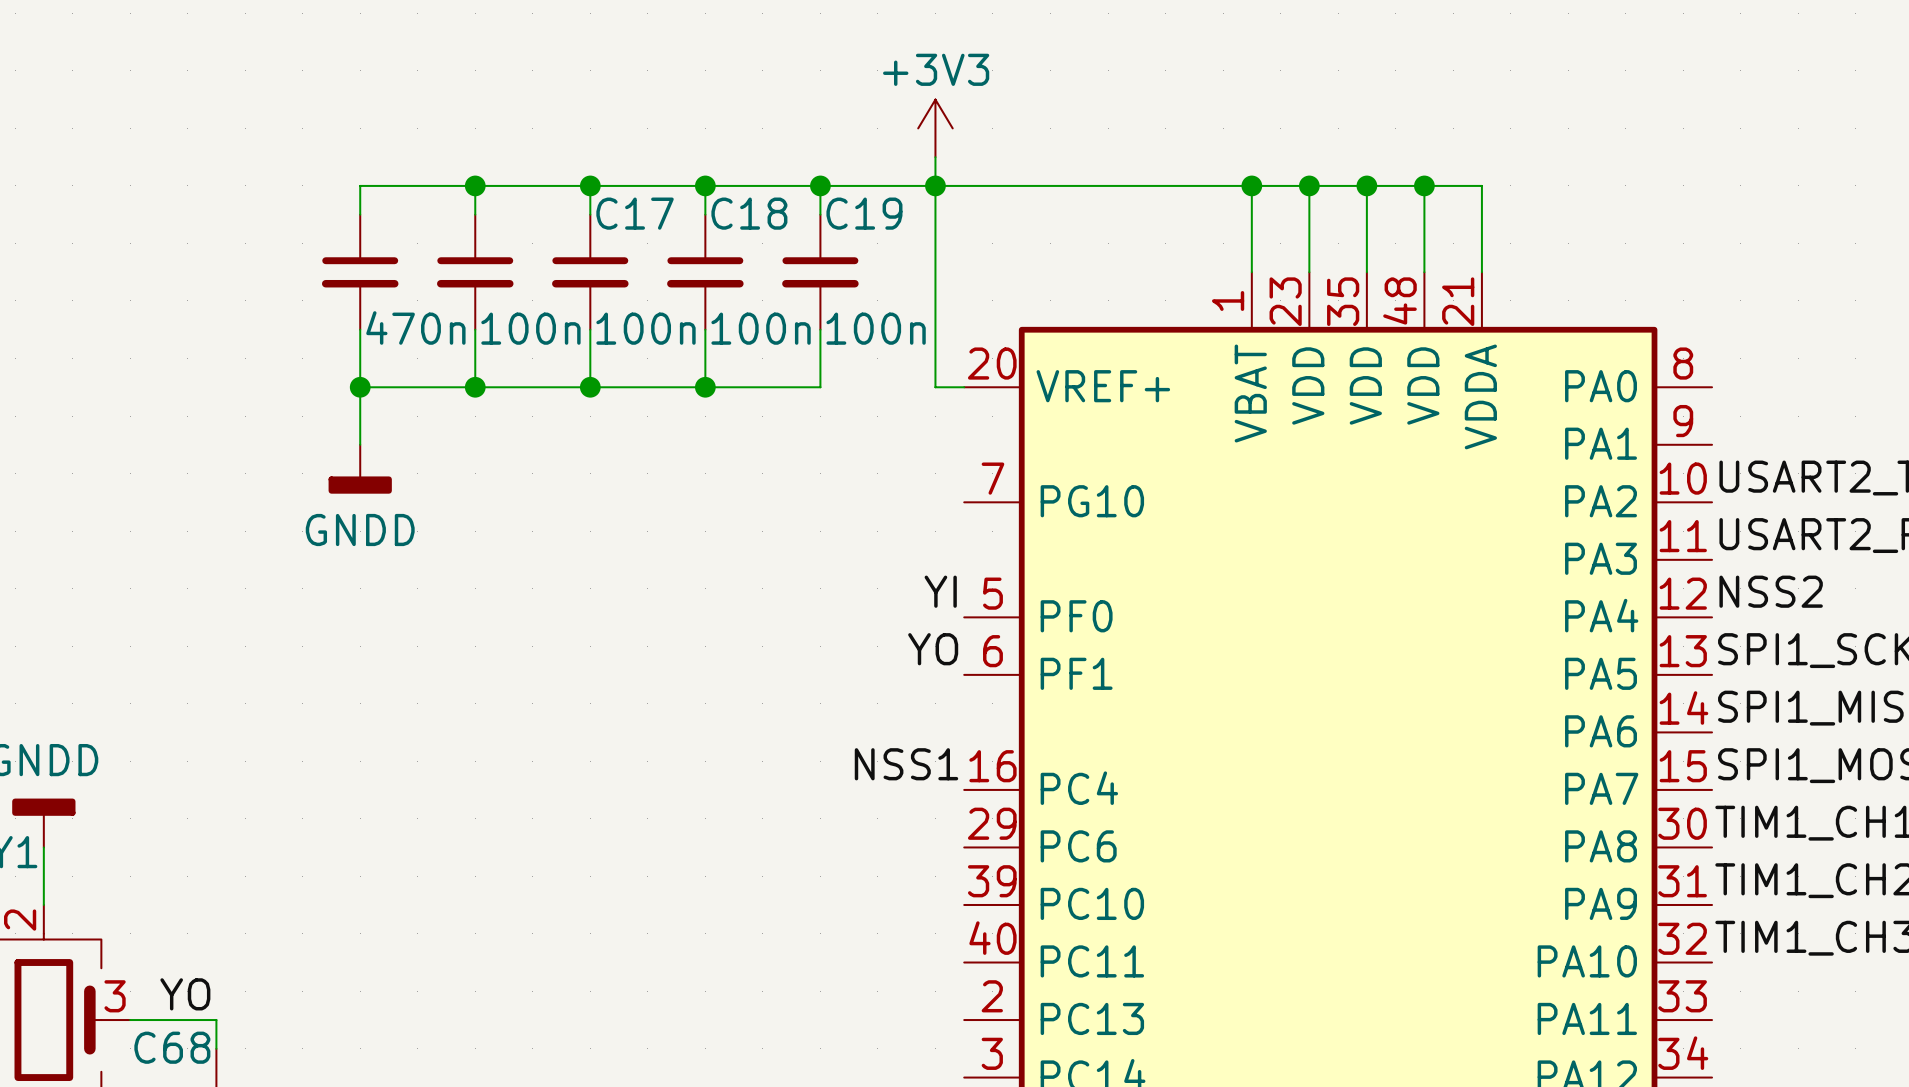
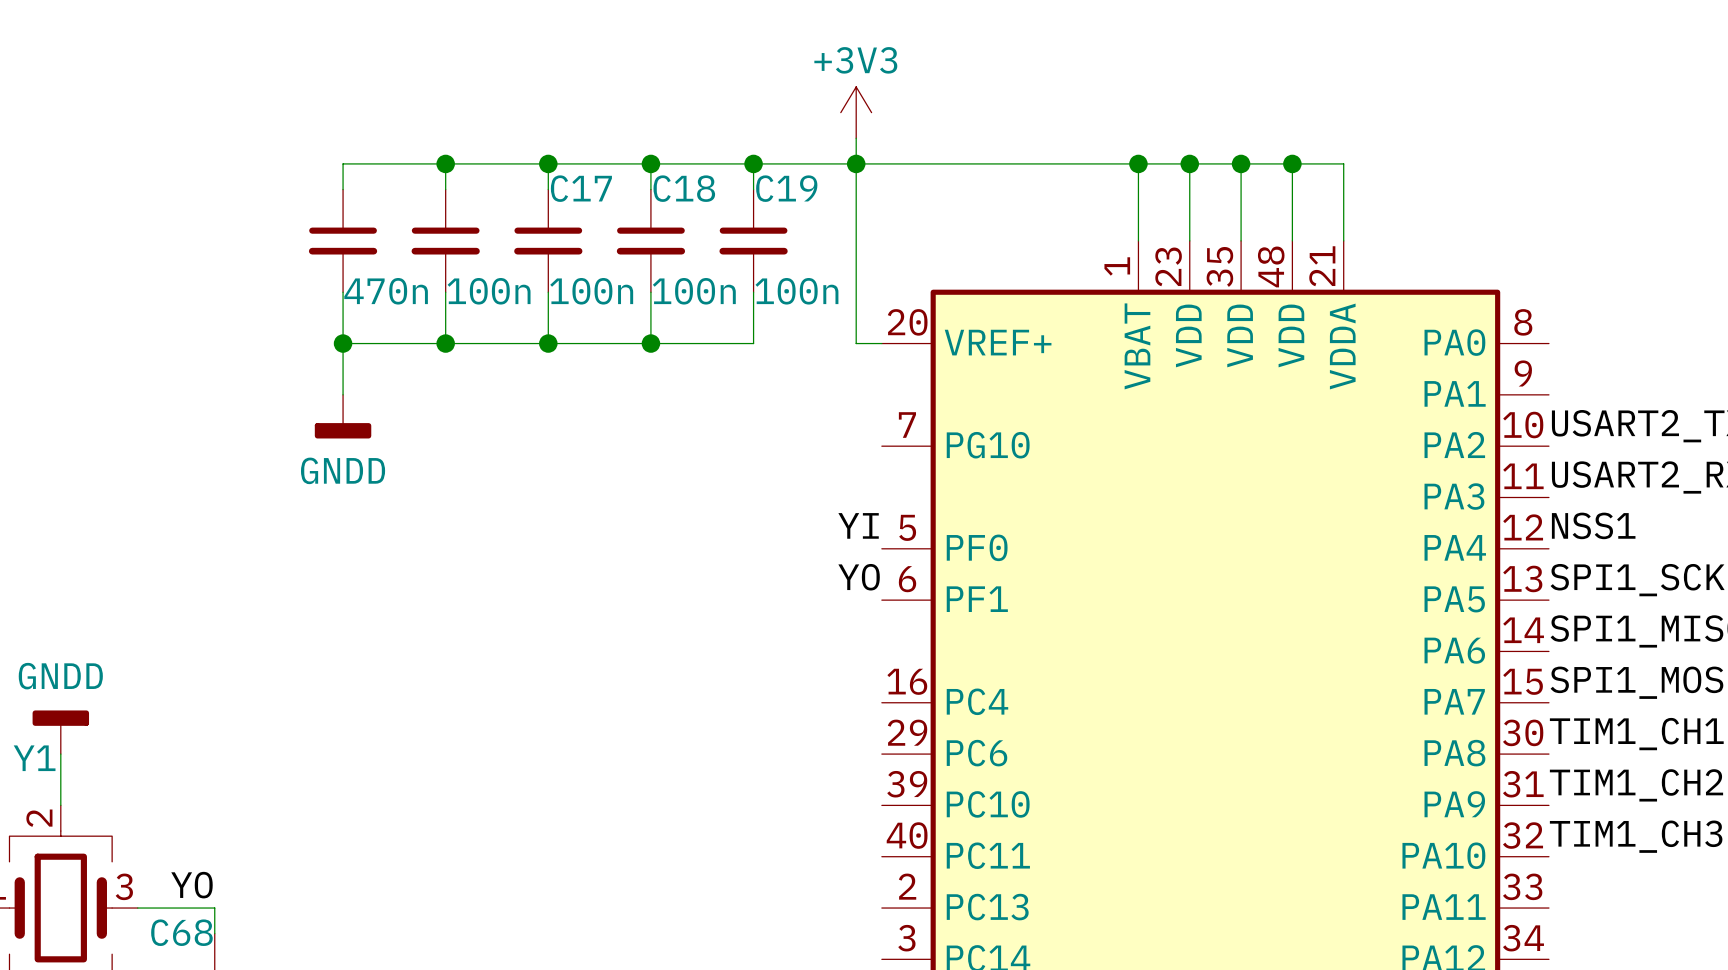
label: NSS2 (1771, 591) -> NSS1 (1593, 525)
label: NSS1 (906, 764) -> none

